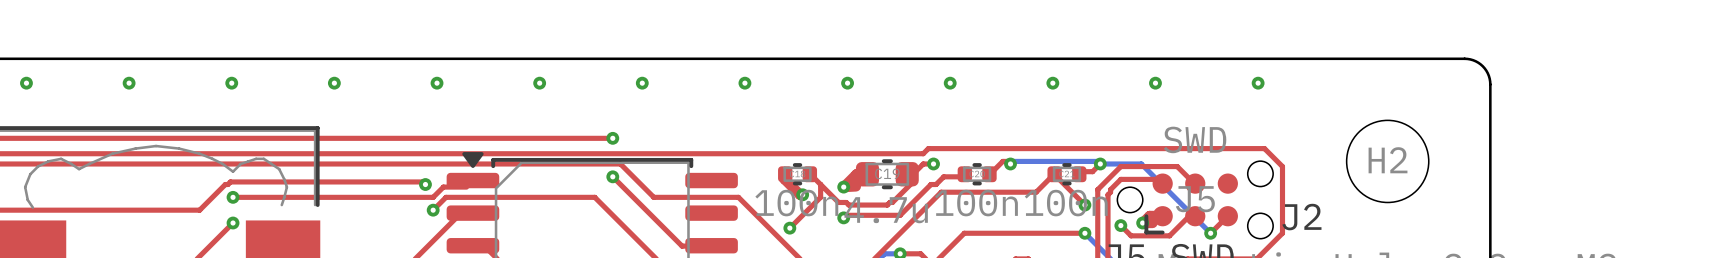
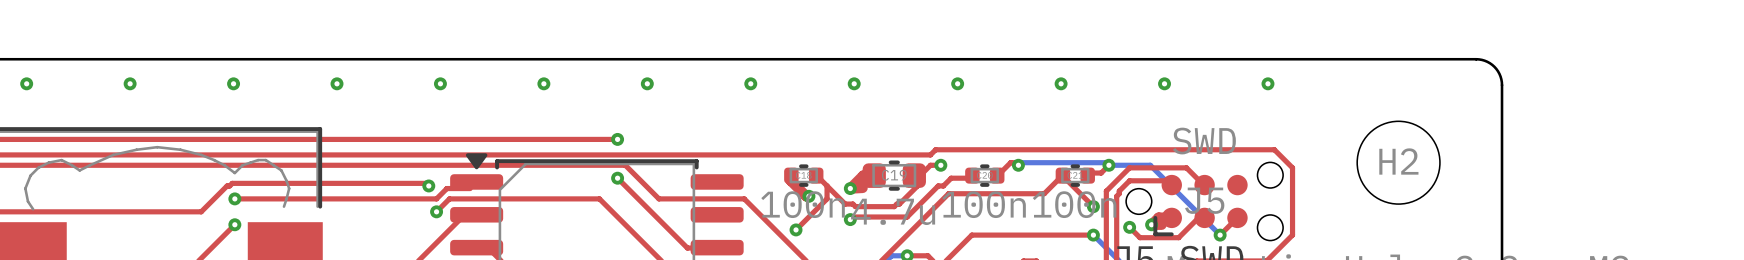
text: J2 (1301, 217) -> none

